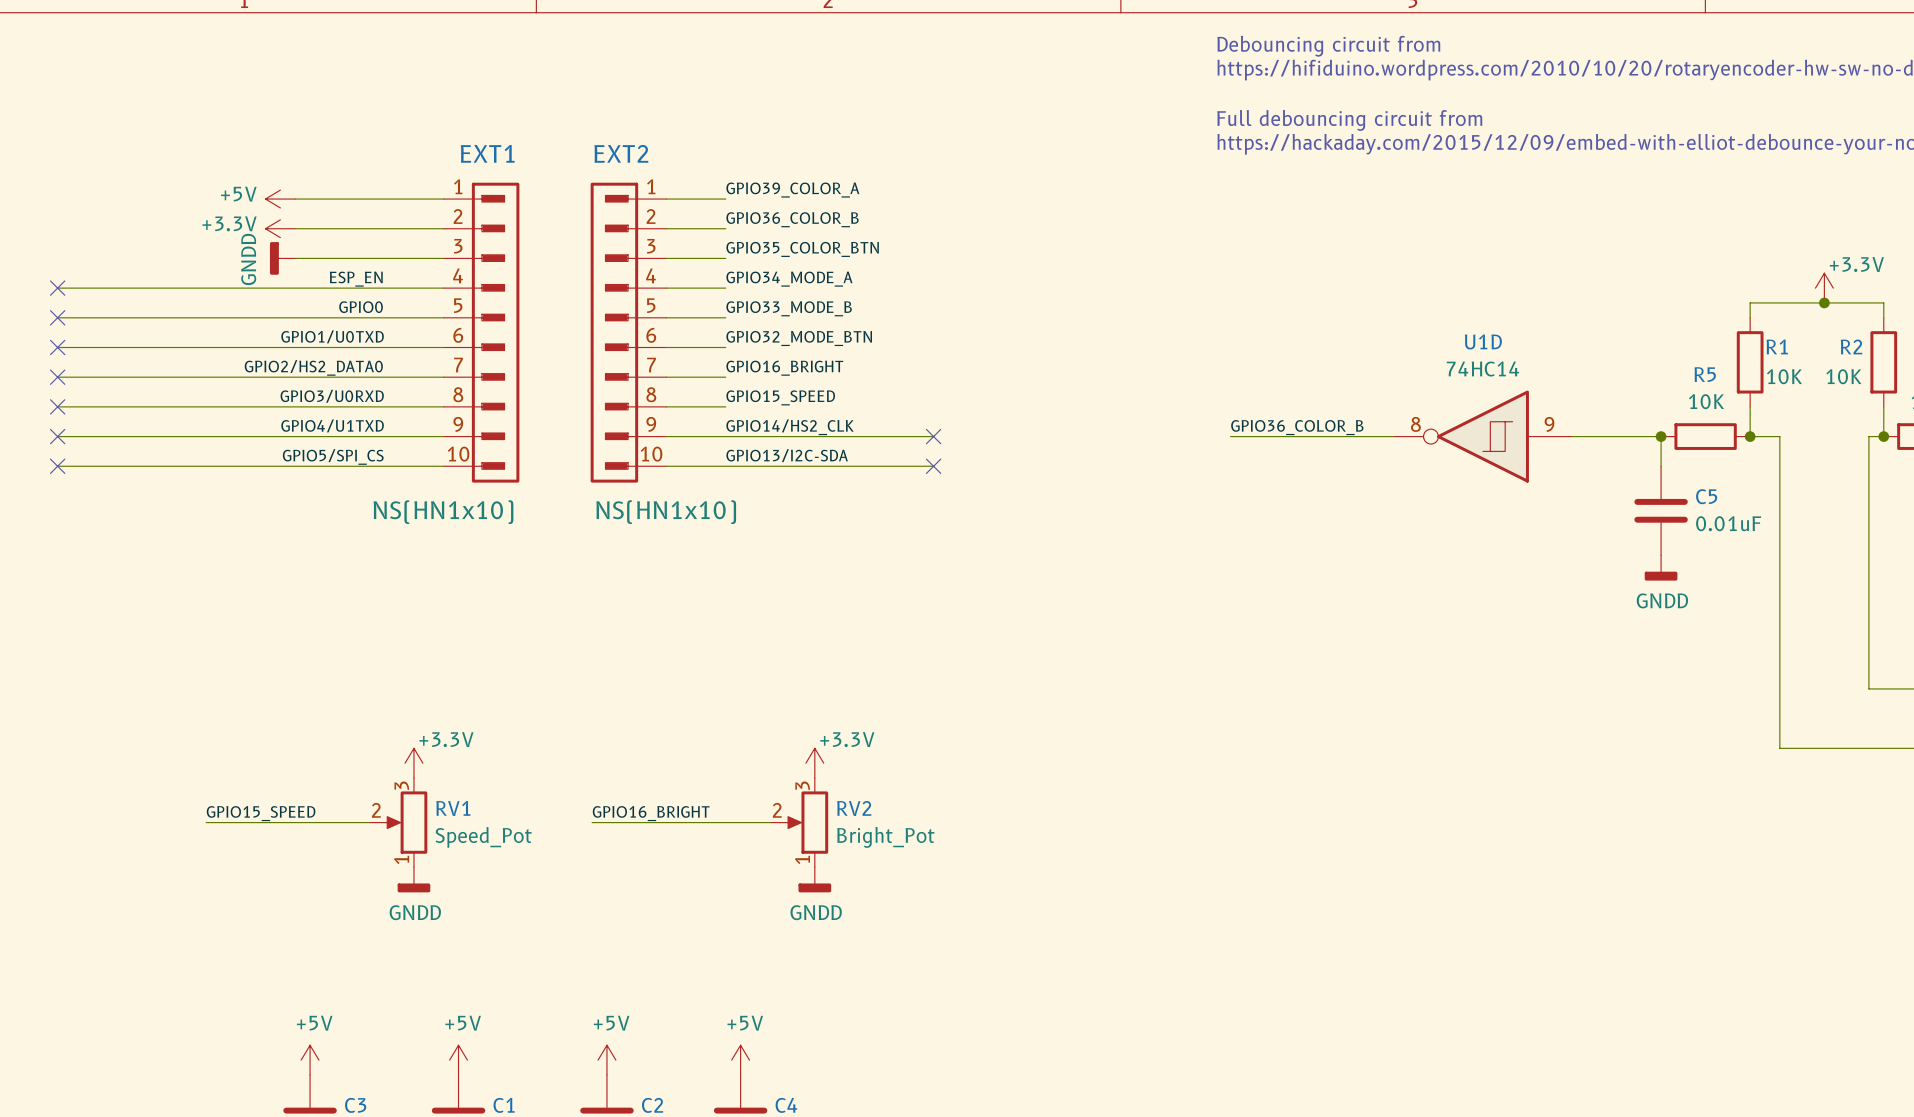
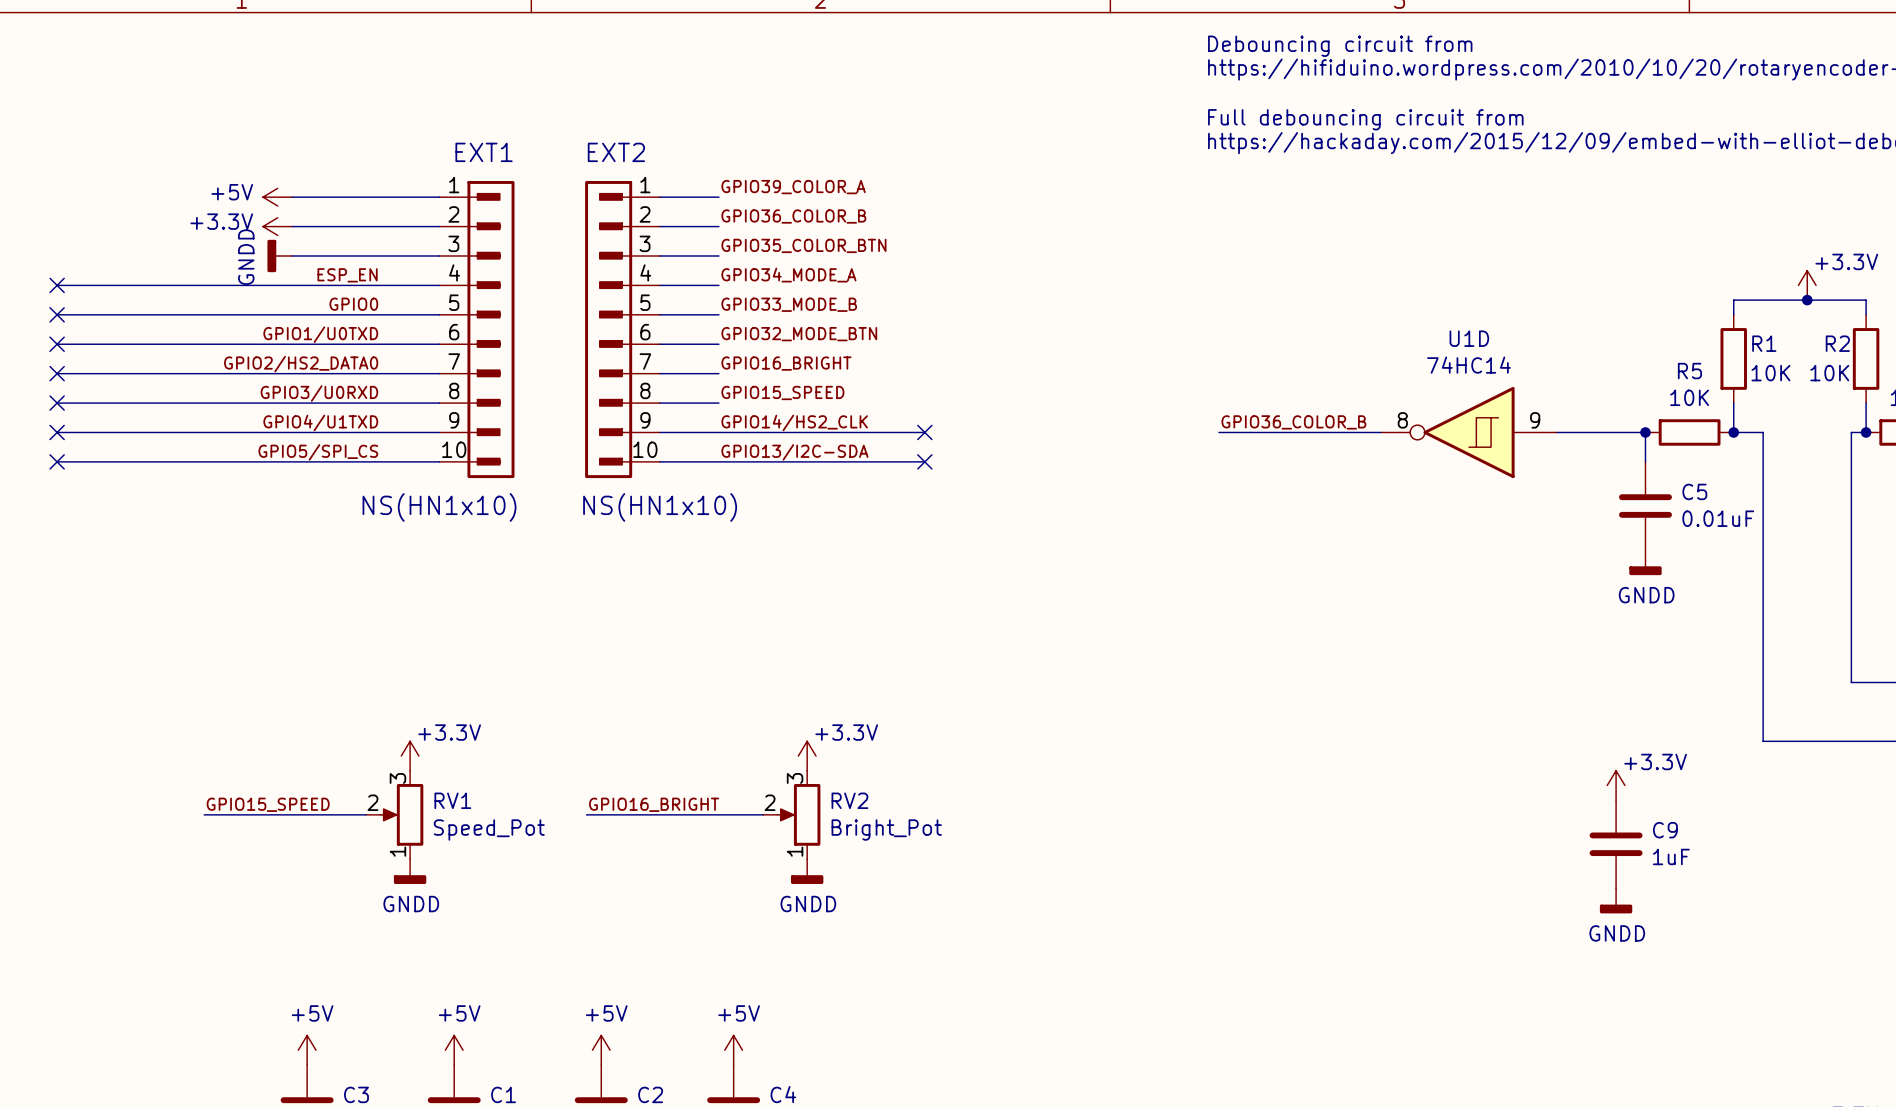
power symbol: none -> +3.3V (1616, 785)
C9: none -> 1uF (1616, 844)
power symbol: none -> GNDD (1616, 900)

